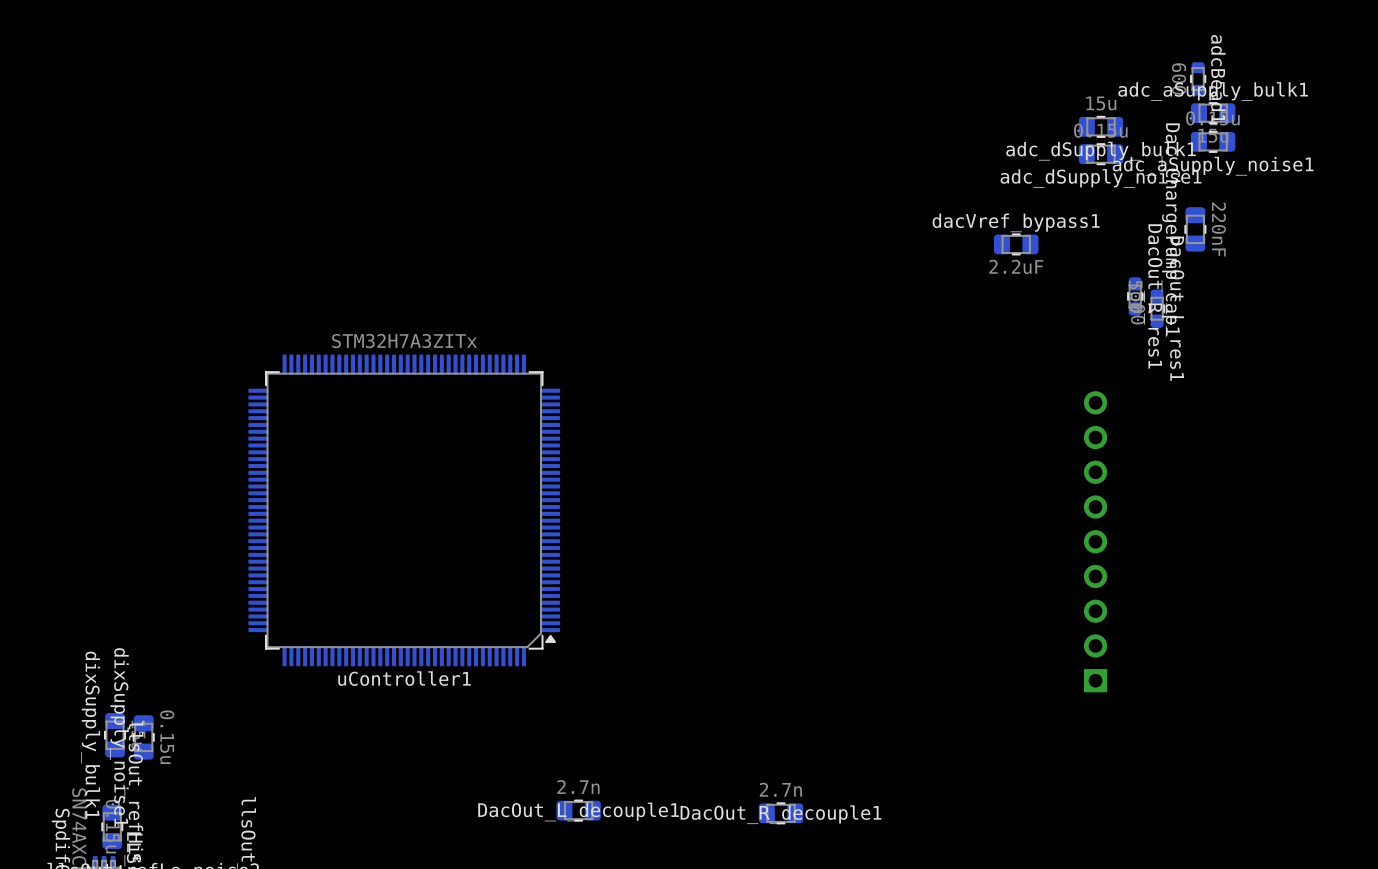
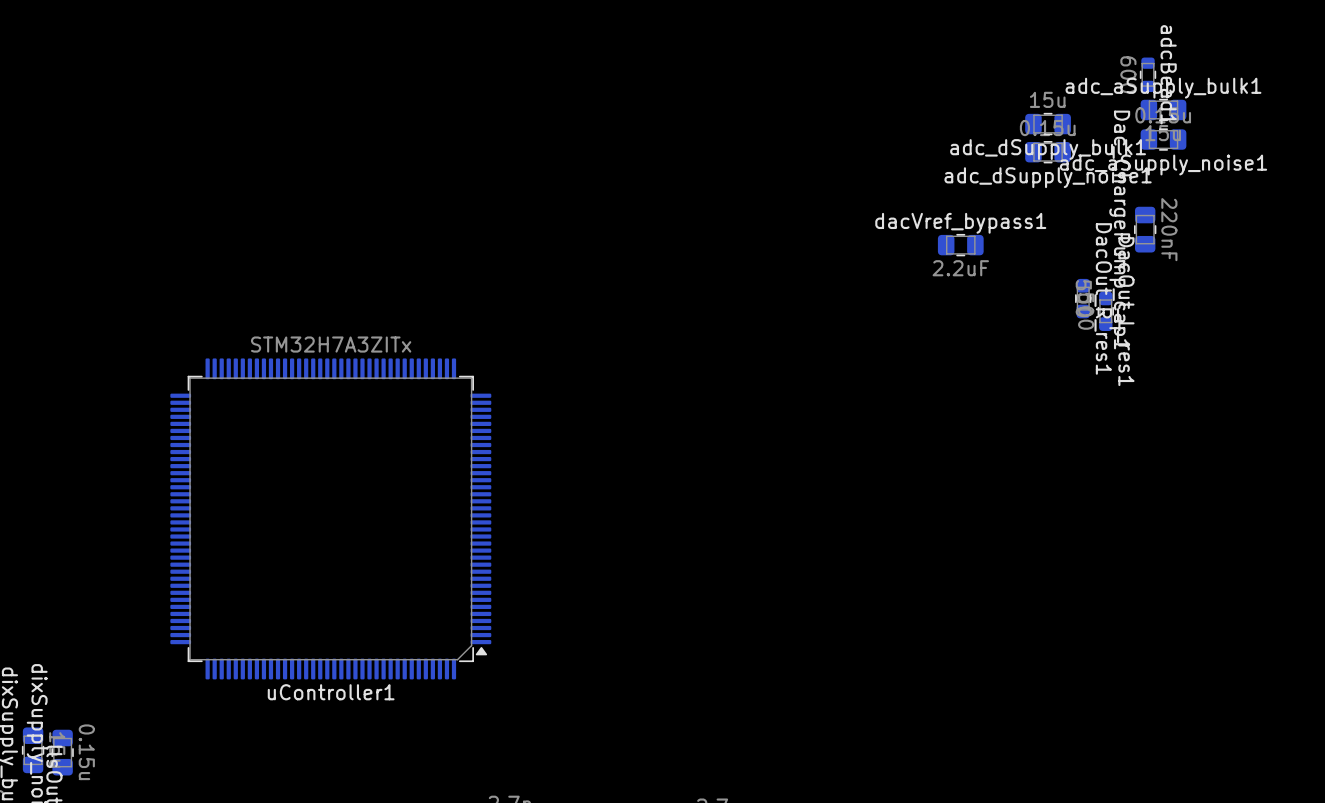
part: (1095, 541) -> none

